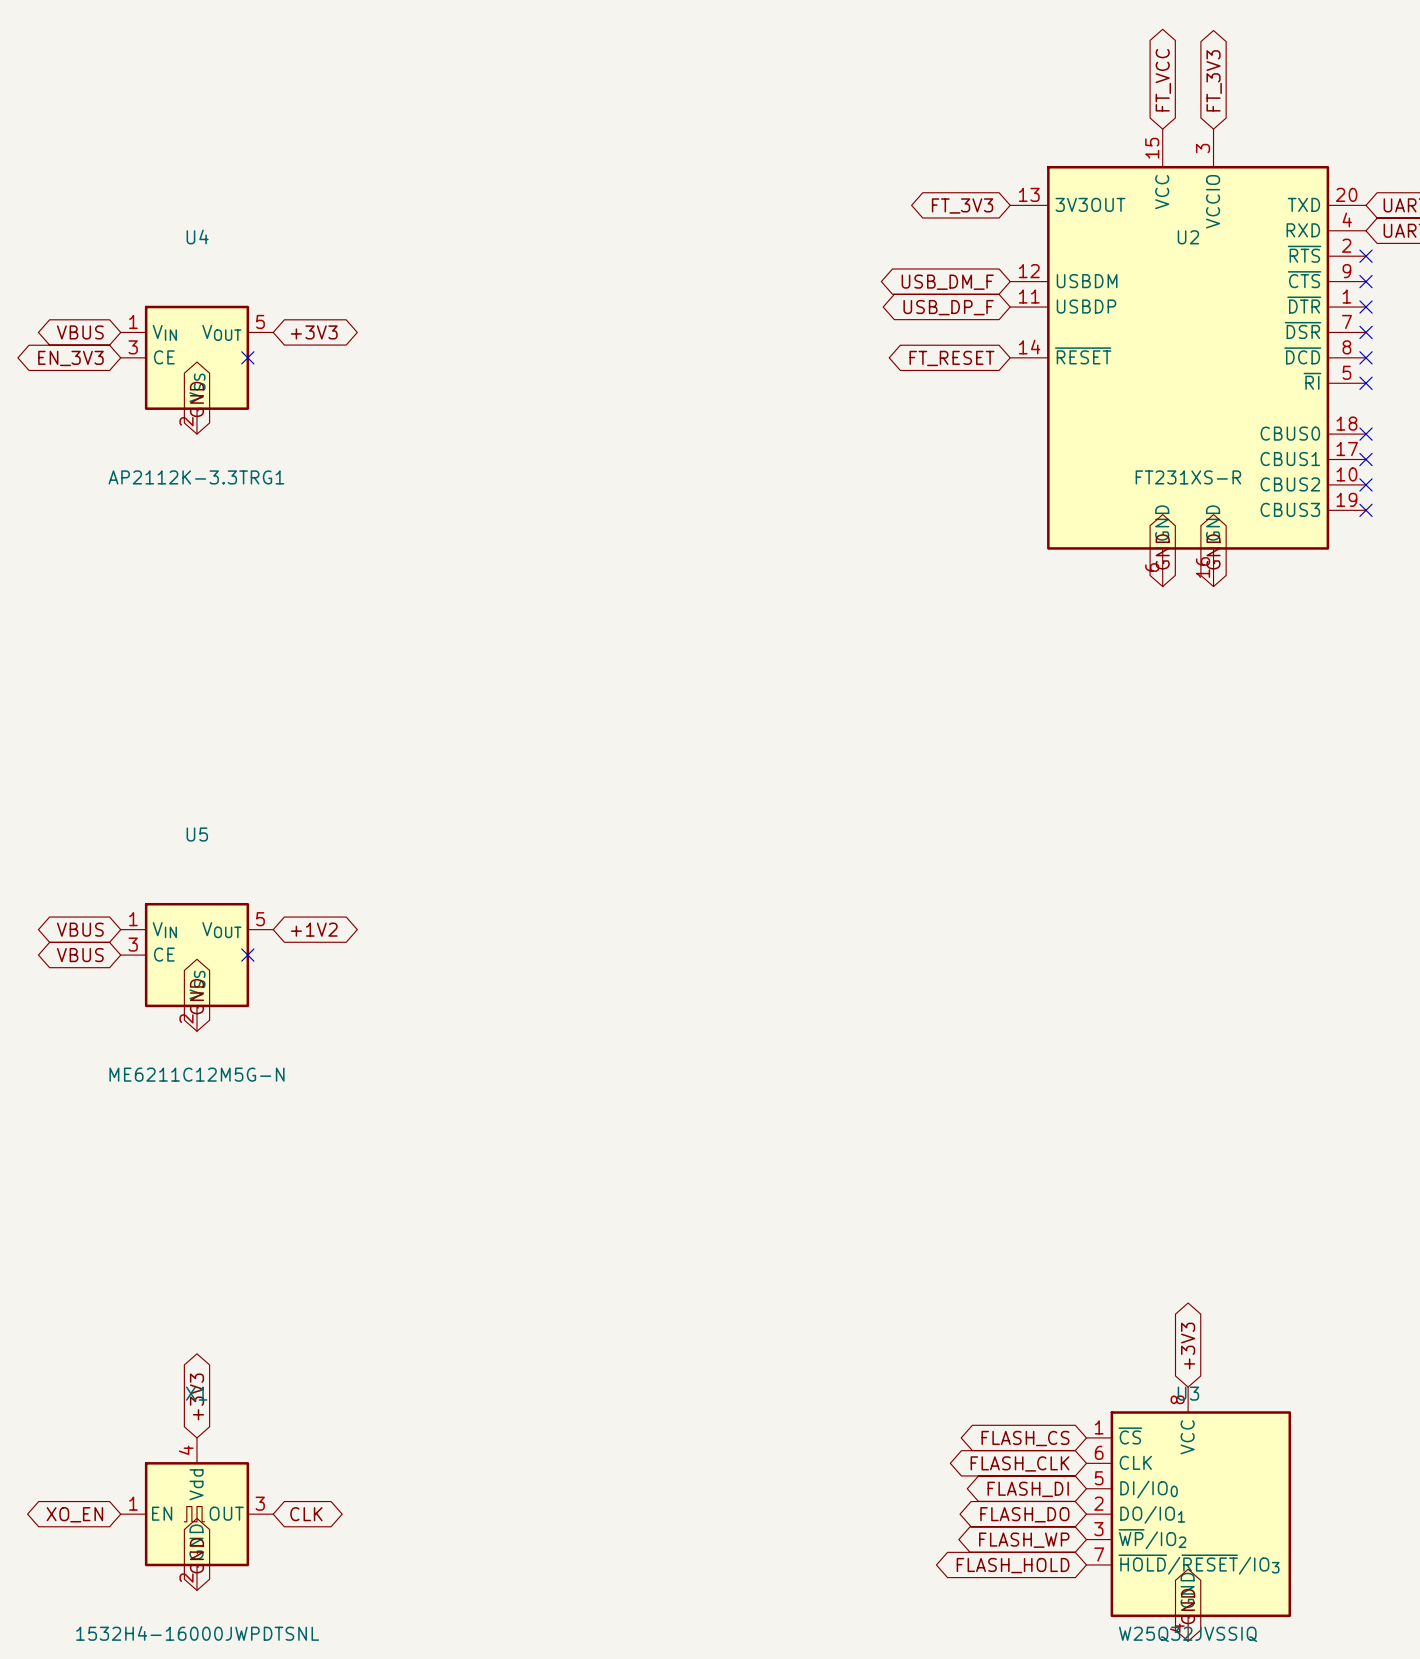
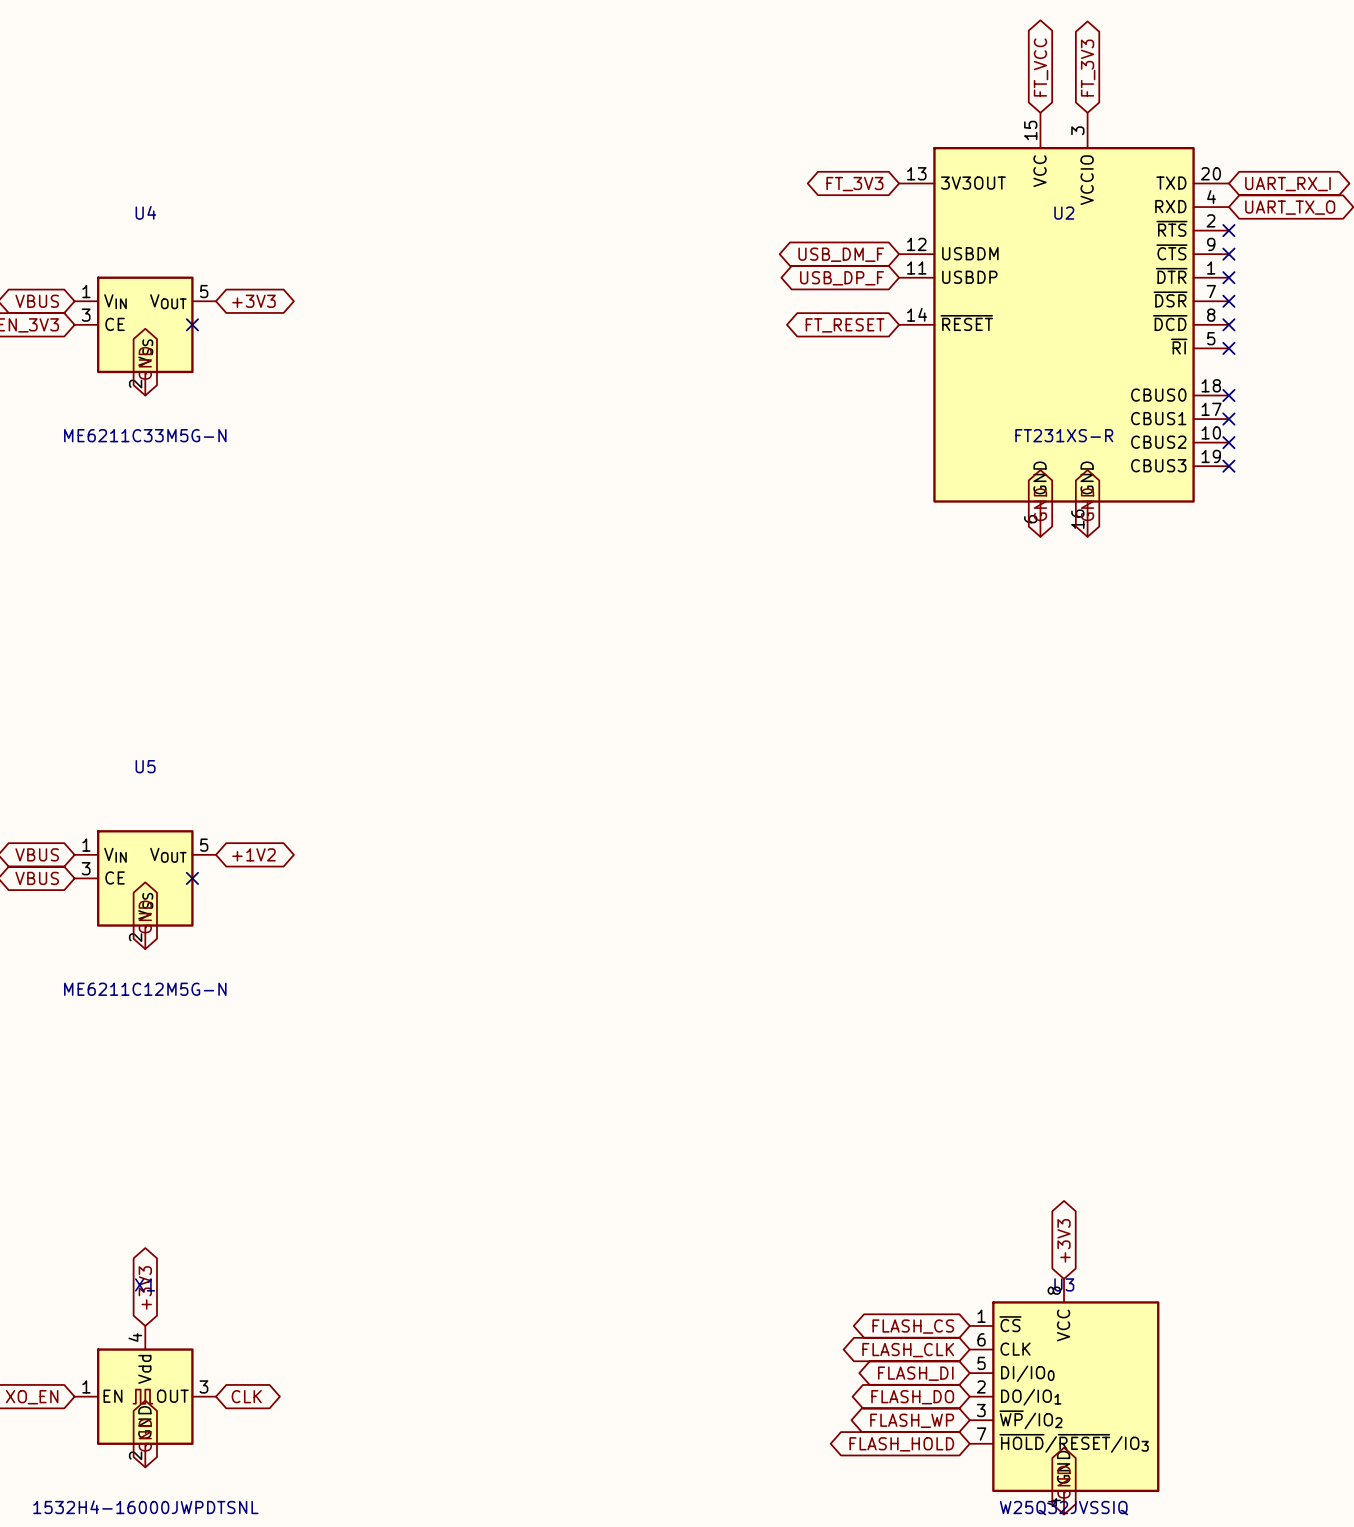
U4 value: AP2112K-3.3TRG1 (196, 477) -> ME6211C33M5G-N (145, 435)

